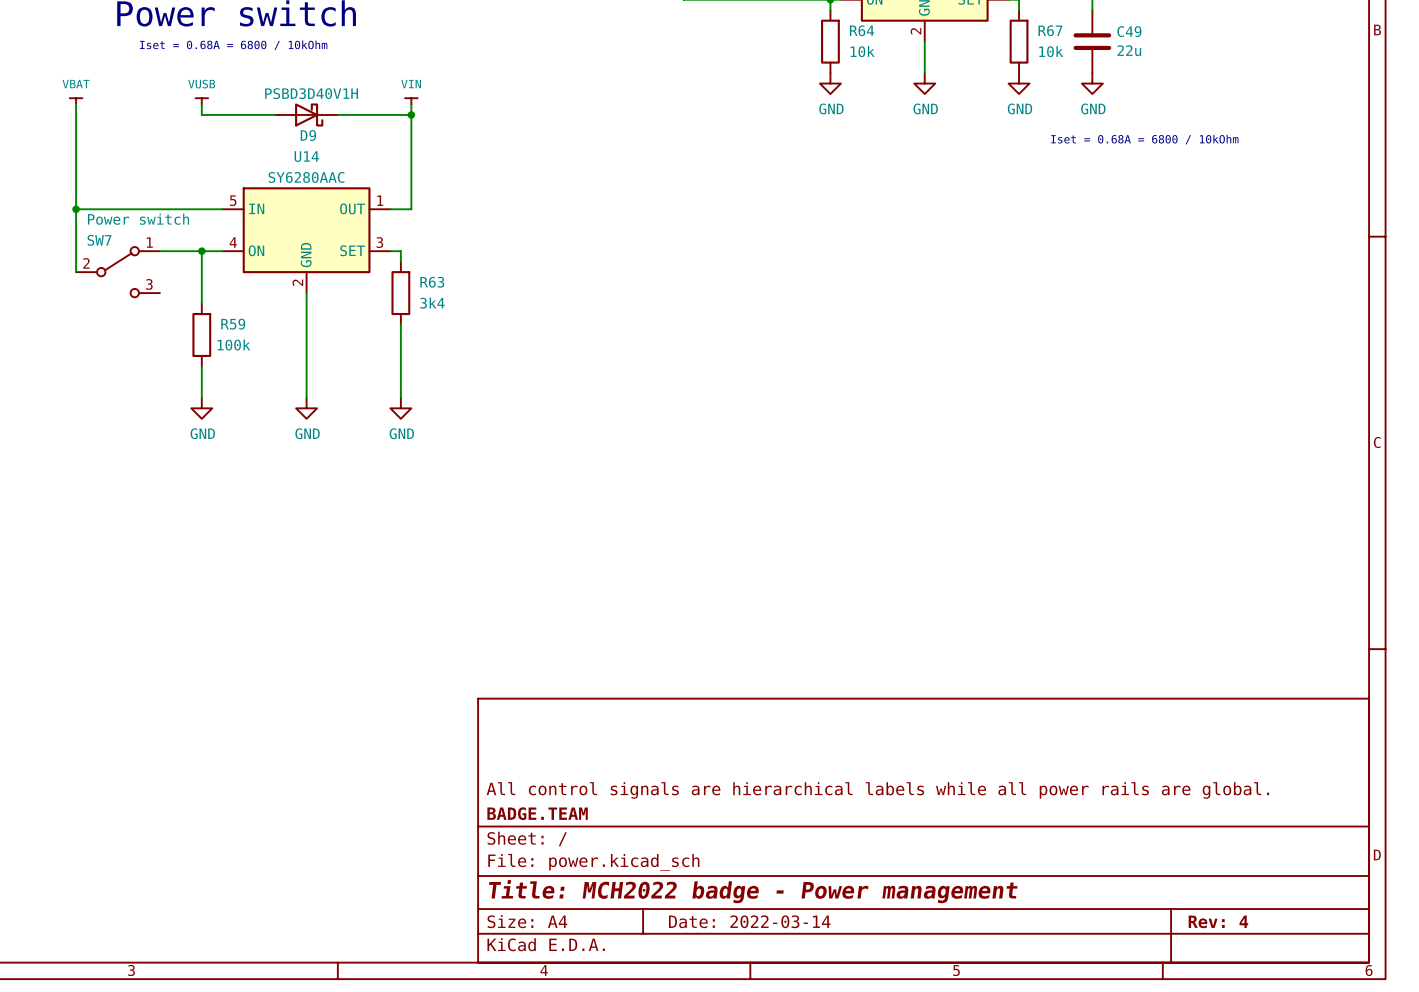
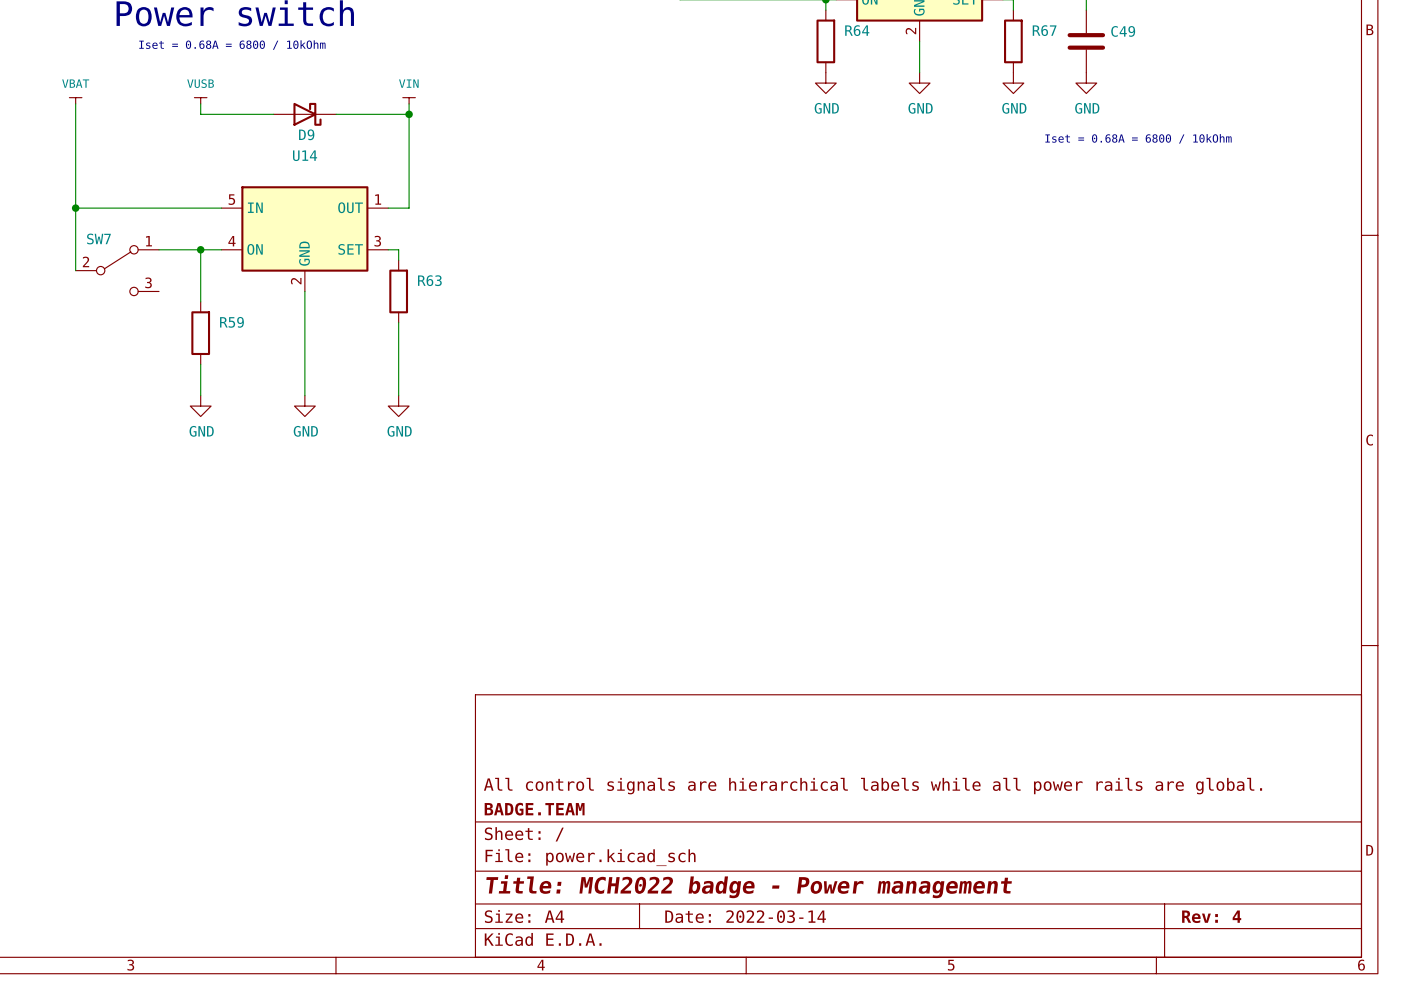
C49 value: 22u (1129, 50) -> none
R64 value: 10k (862, 51) -> none
R67 value: 10k (1051, 51) -> none
D9 value: PSBD3D40V1H (311, 93) -> none
U14 value: SY6280AAC (306, 177) -> none
SW7 value: Power switch (138, 219) -> none
R63 value: 3k4 (432, 303) -> none
R59 value: 100k (233, 344) -> none

